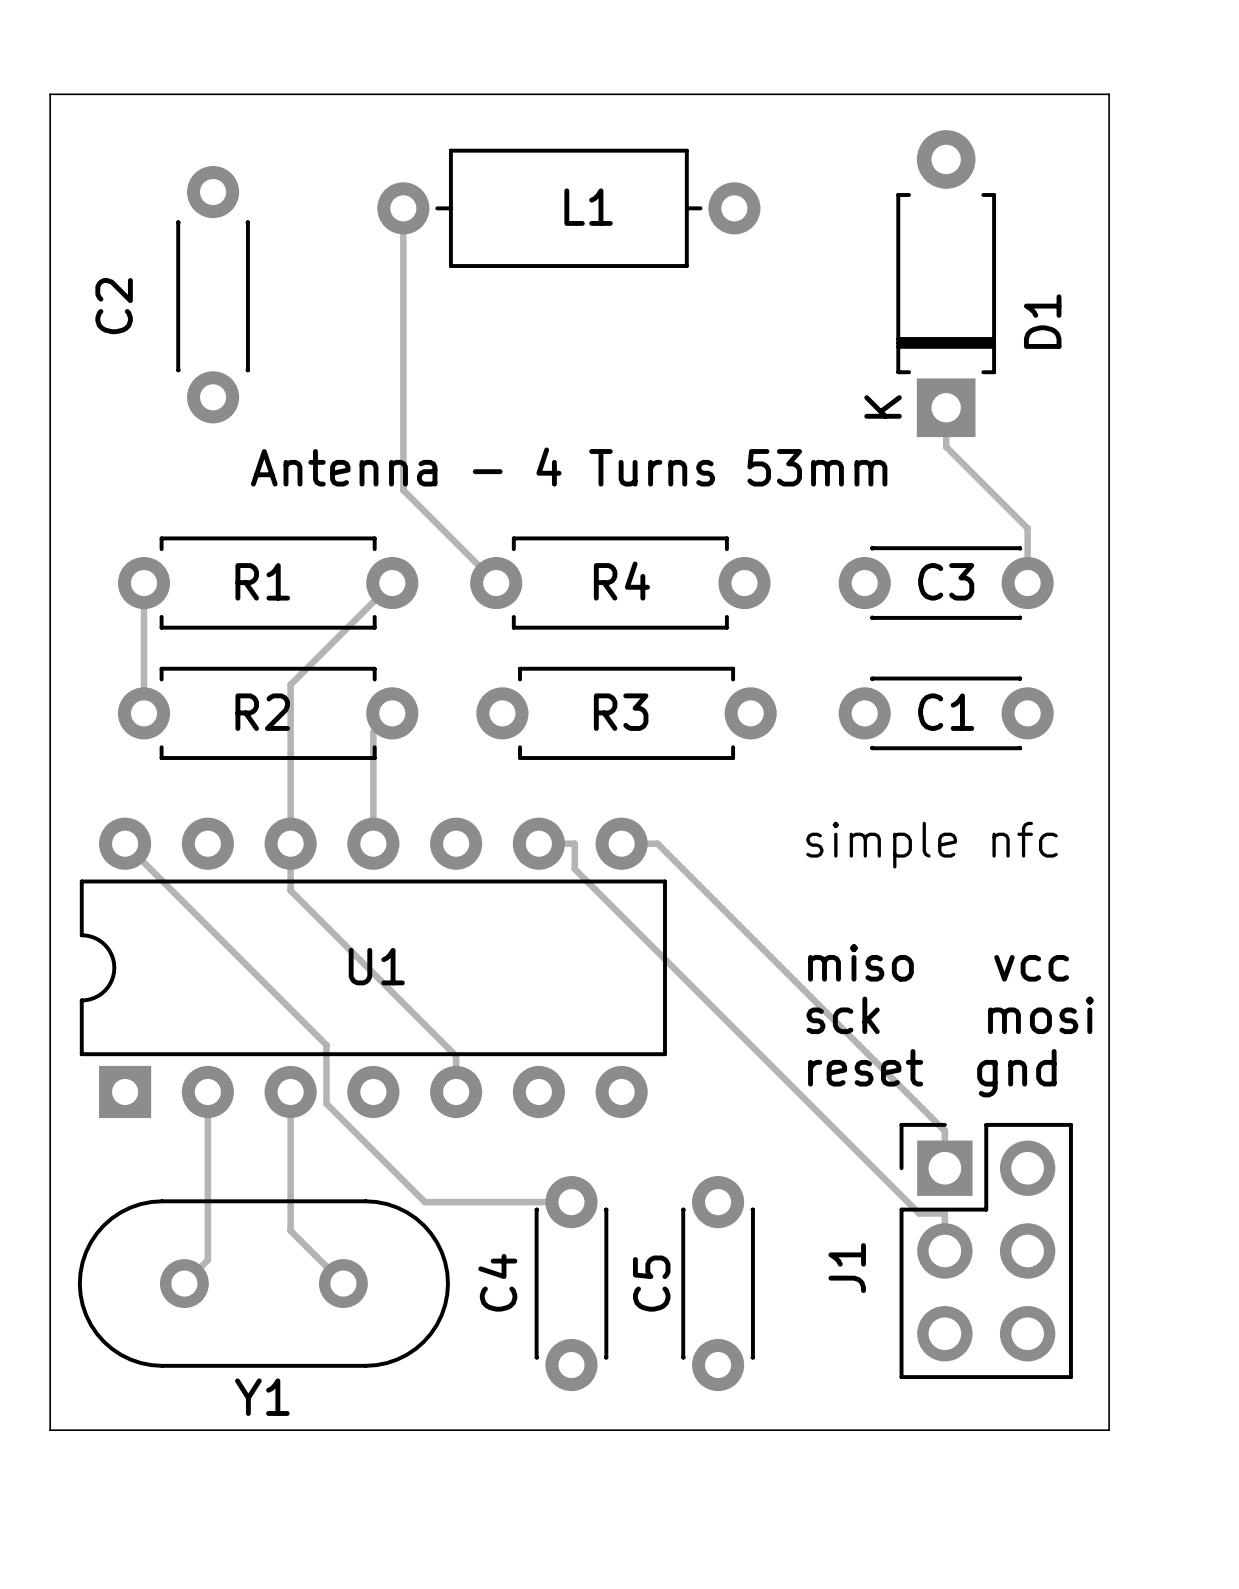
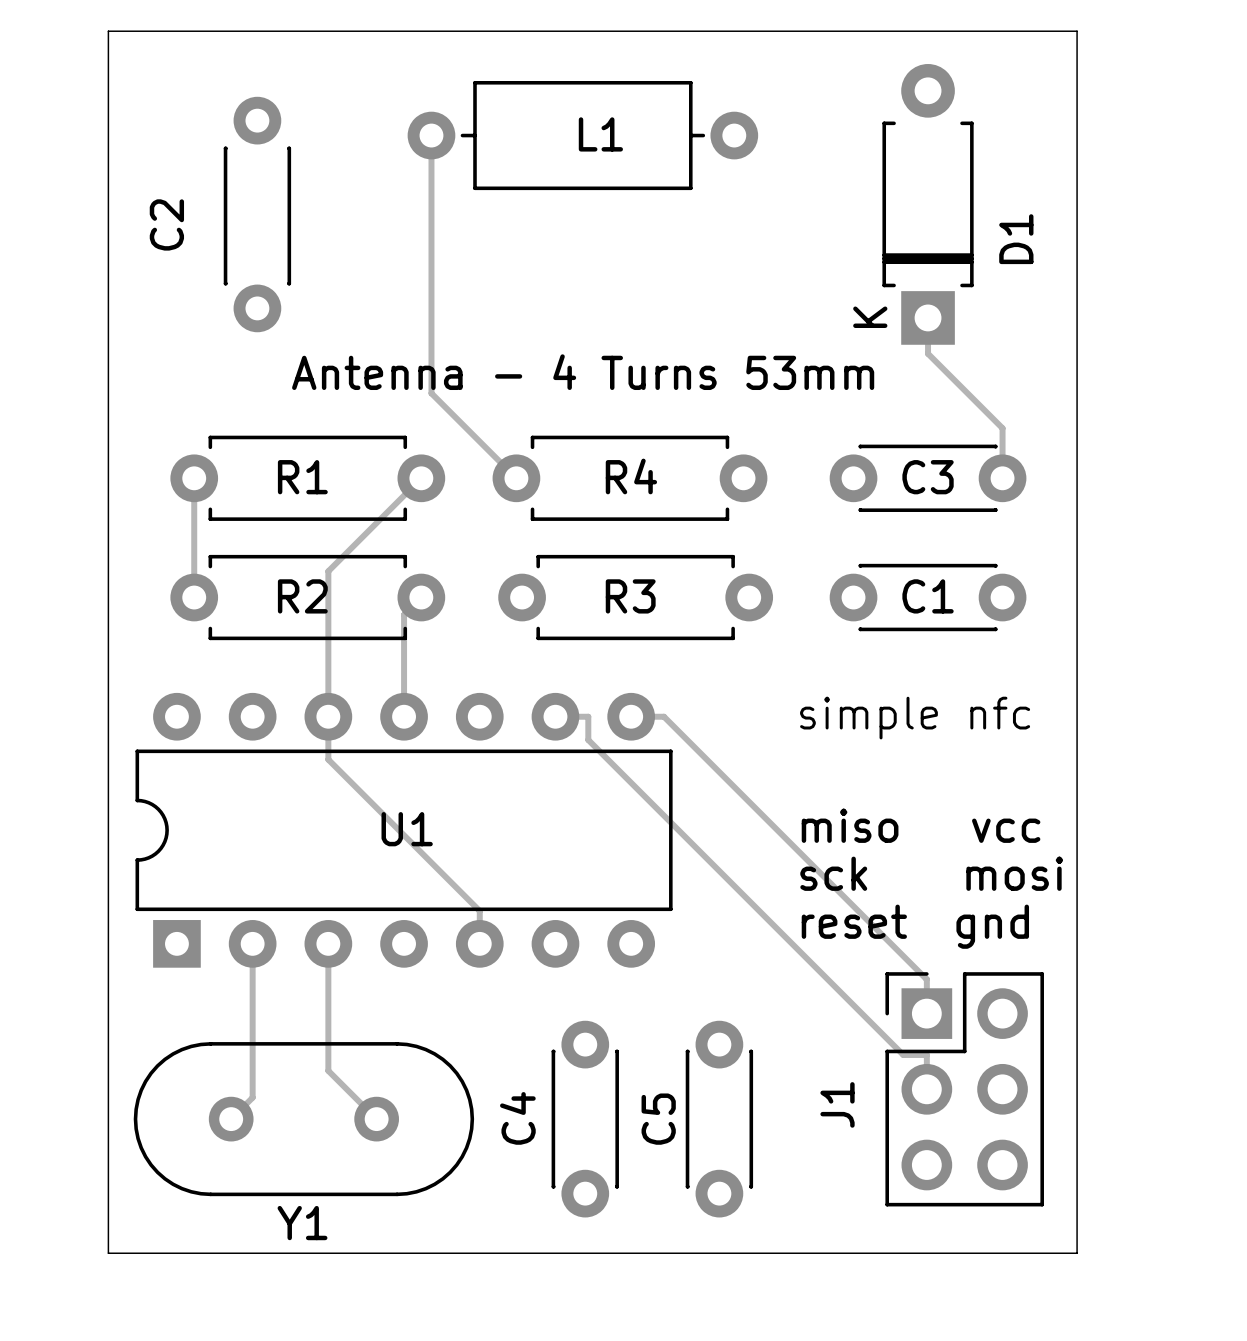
track: (125, 843) (326, 1045) (326, 1103) (424, 1202) (571, 1202) -> none

